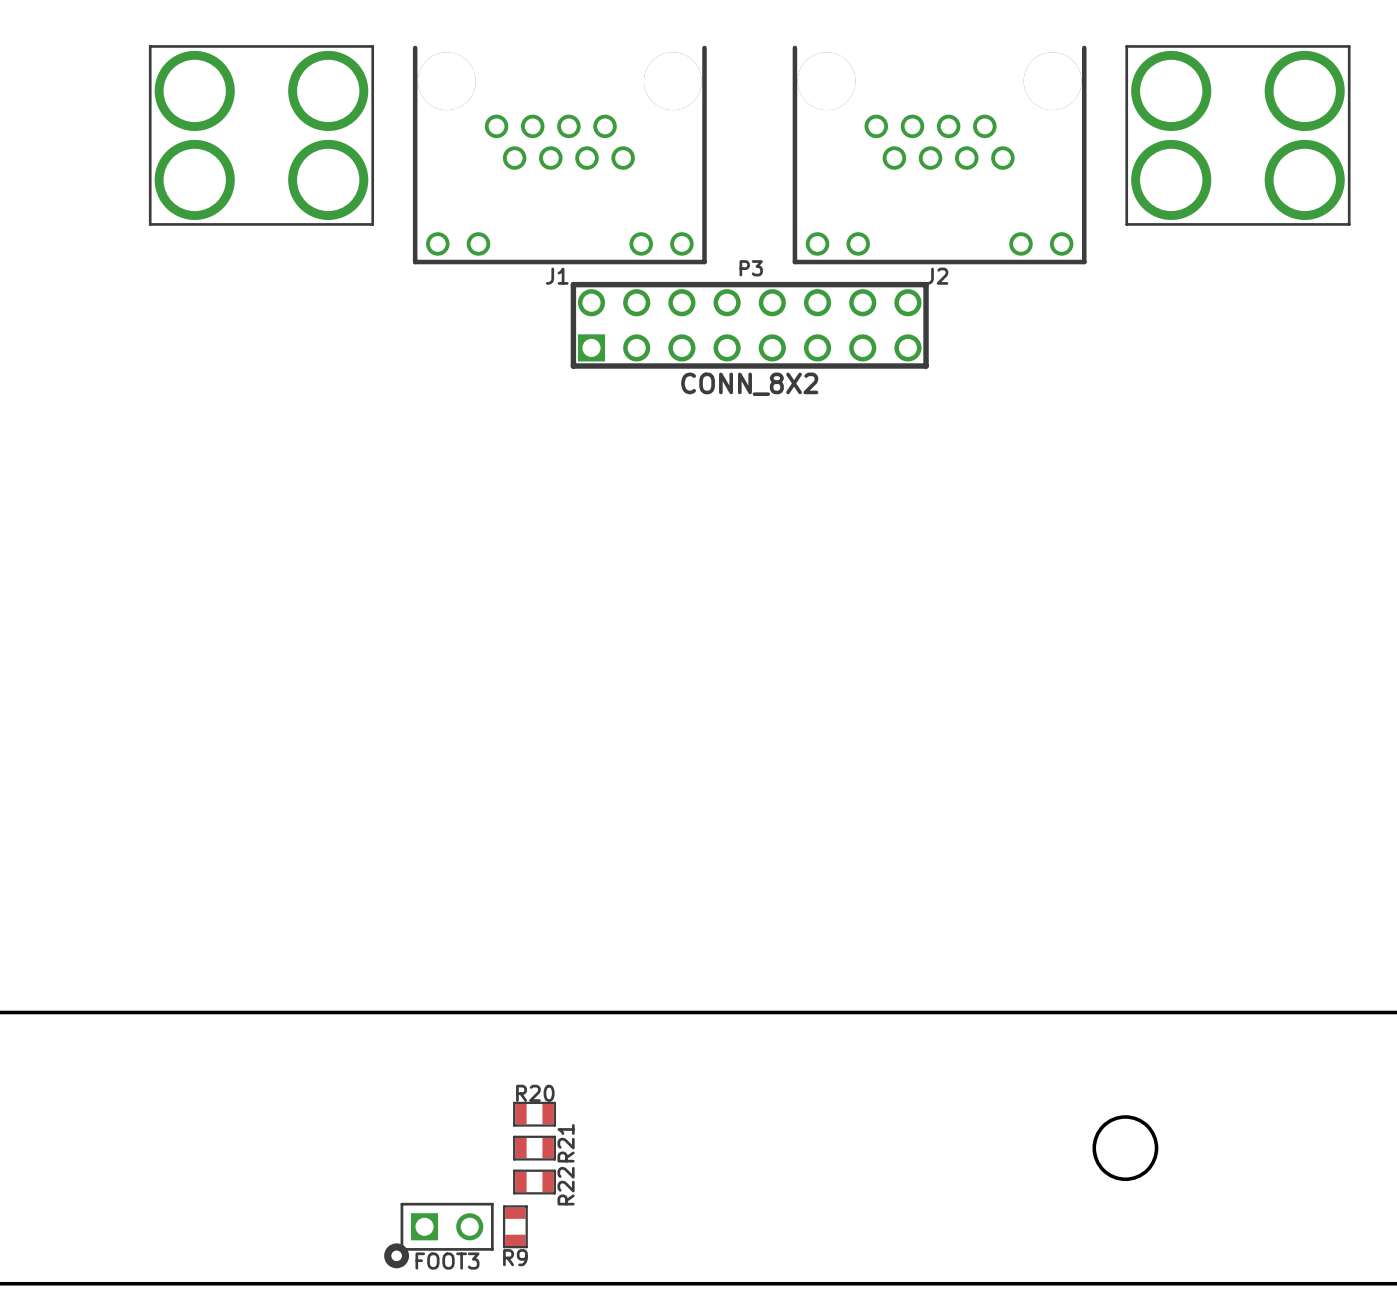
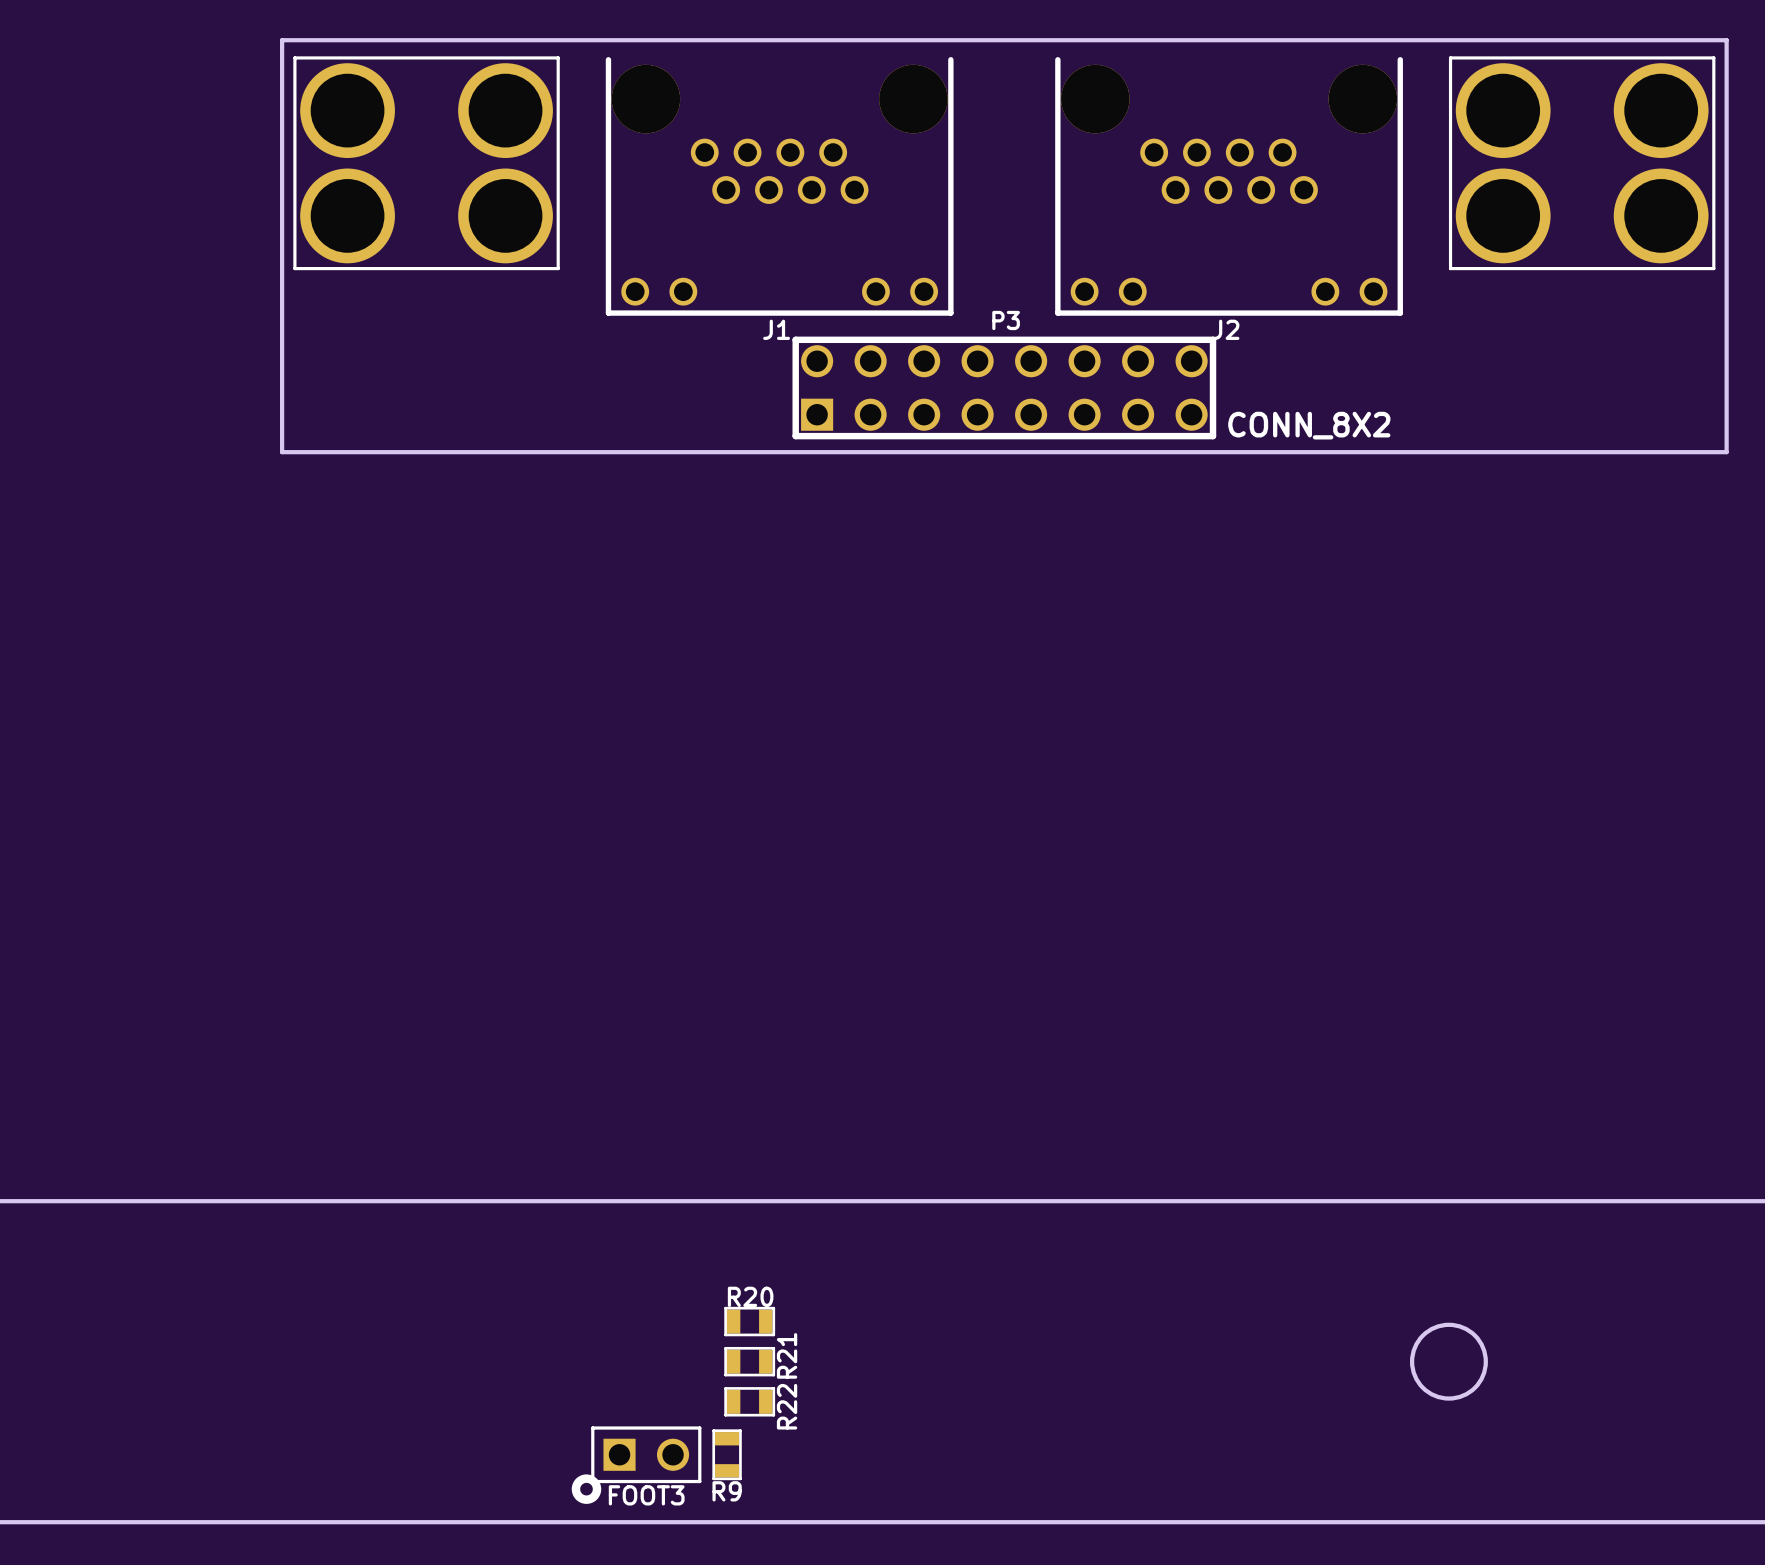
board edge: none -> (282, 40) (1726, 40) (1726, 452) (282, 452) (282, 40)
P3 value position: CONN_8X2 (749, 384) -> CONN_8X2 (1309, 425)

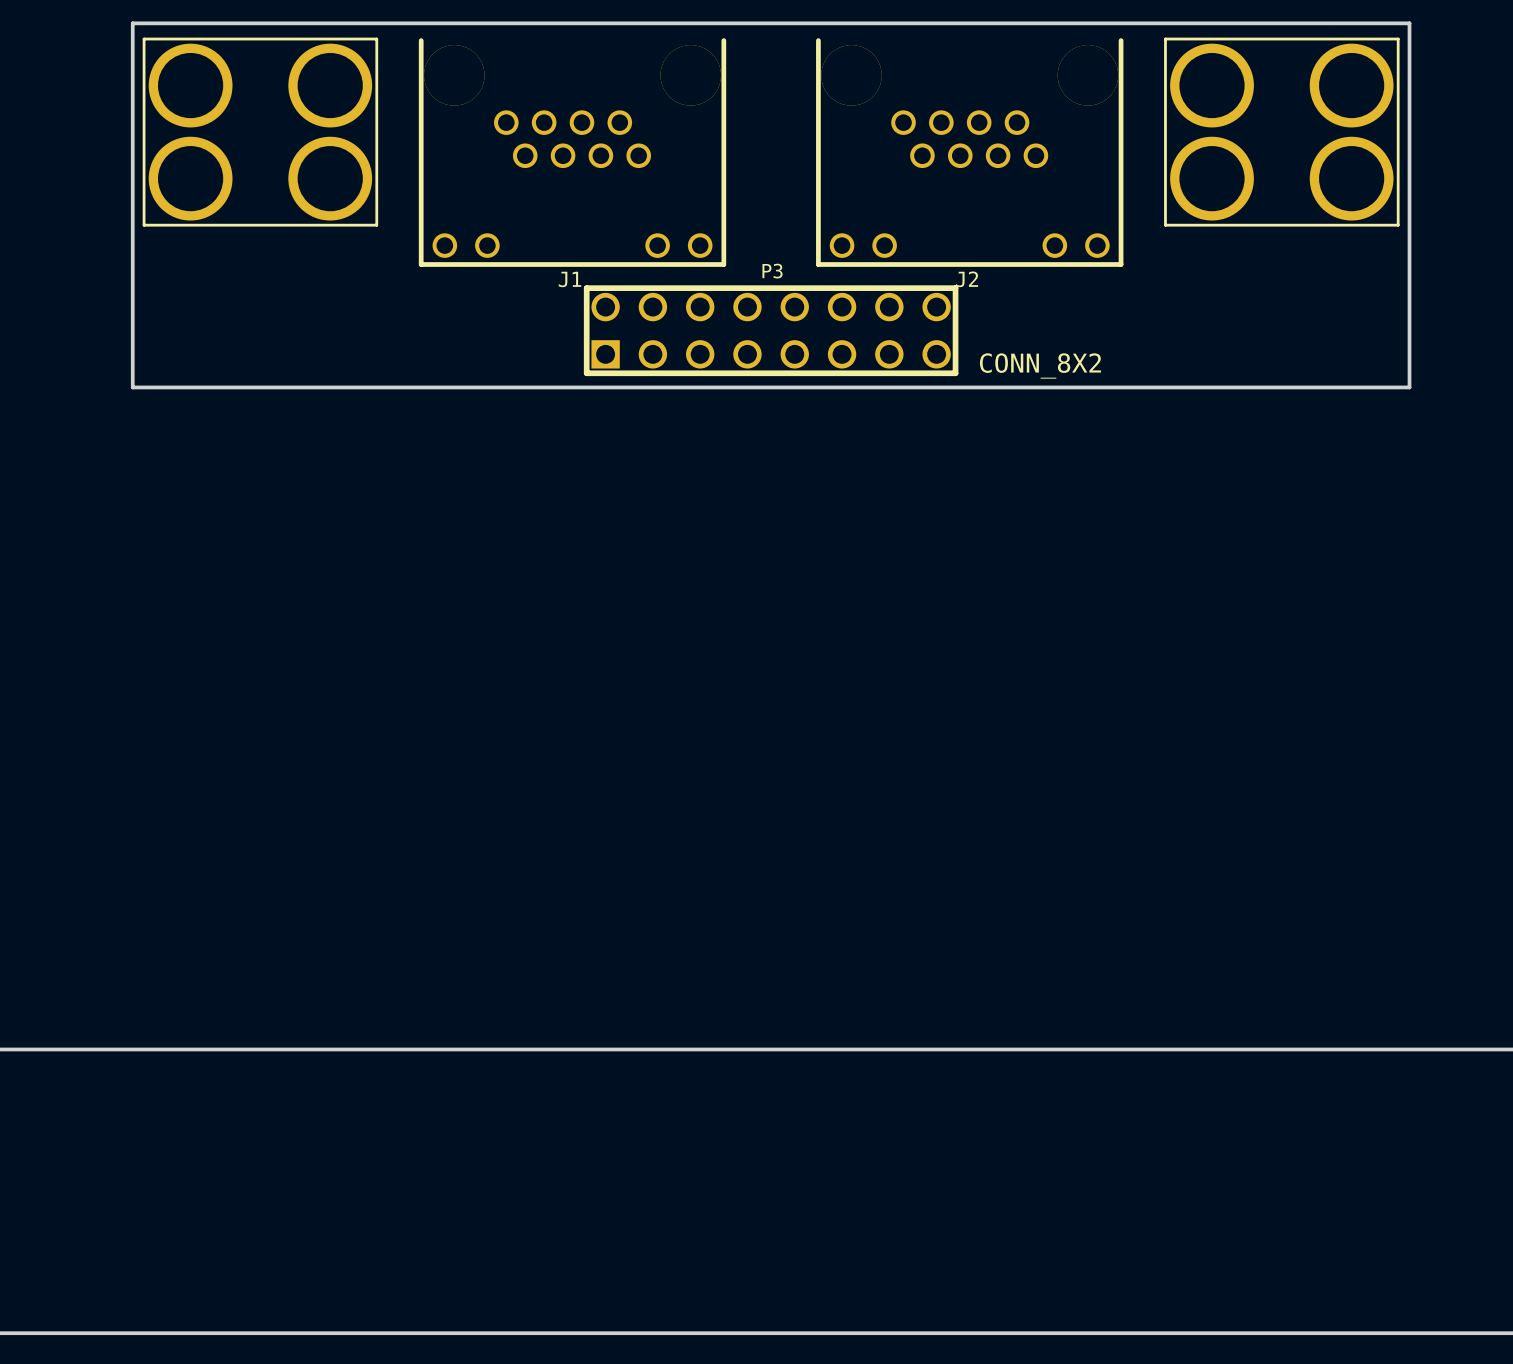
R20: (749, 1321) -> none
round board edge: [1409, 1322, 1488, 1401] -> none
R21: (749, 1361) -> none
R22: (749, 1401) -> none
FOOT3: (646, 1454) -> none
R9: (727, 1454) -> none
drawing: [571, 1474, 602, 1504] -> none

